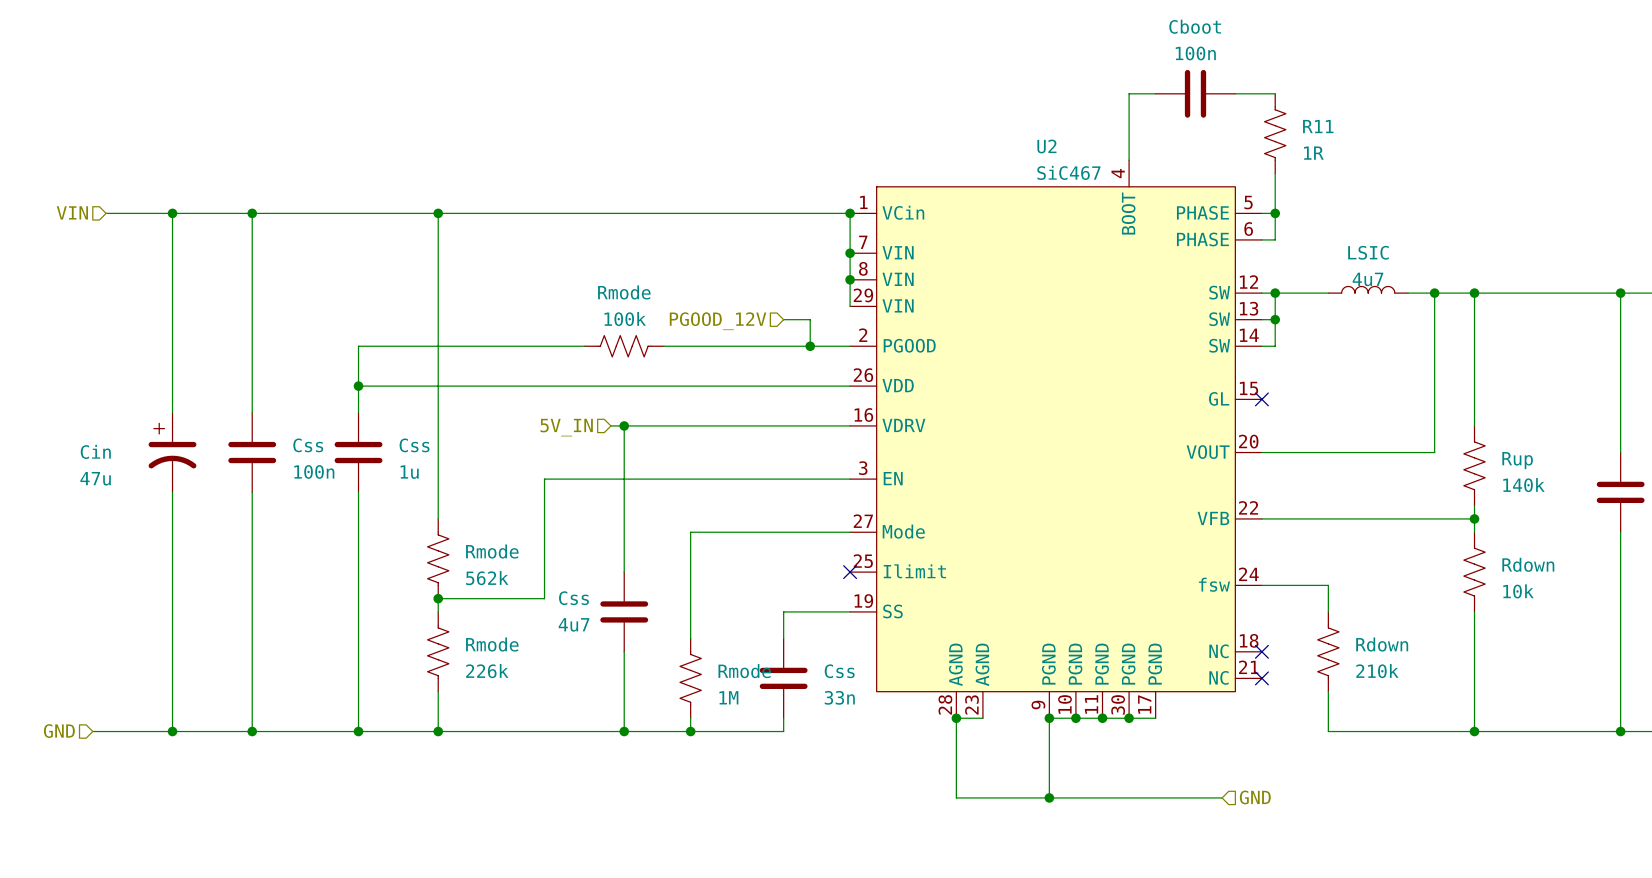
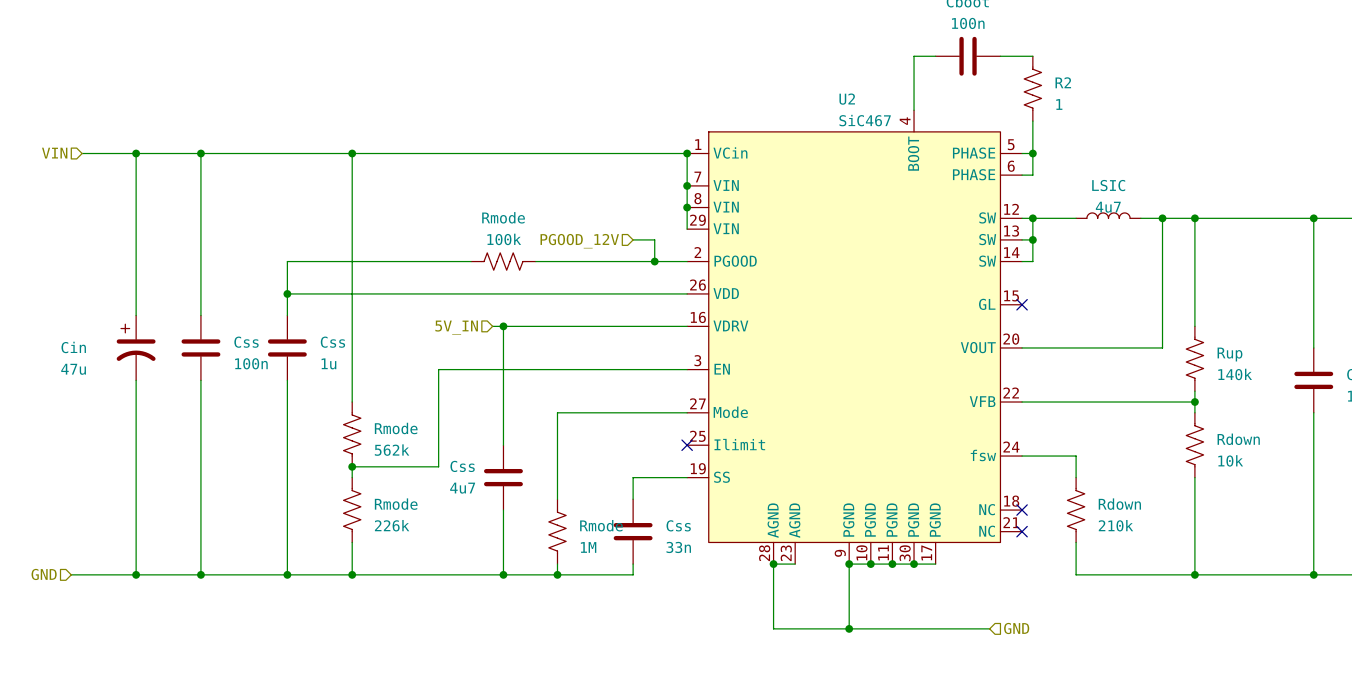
R11 name: R11 (1318, 126) -> R2 (1063, 82)
R11 value: 1R (1313, 153) -> 1 (1059, 104)

